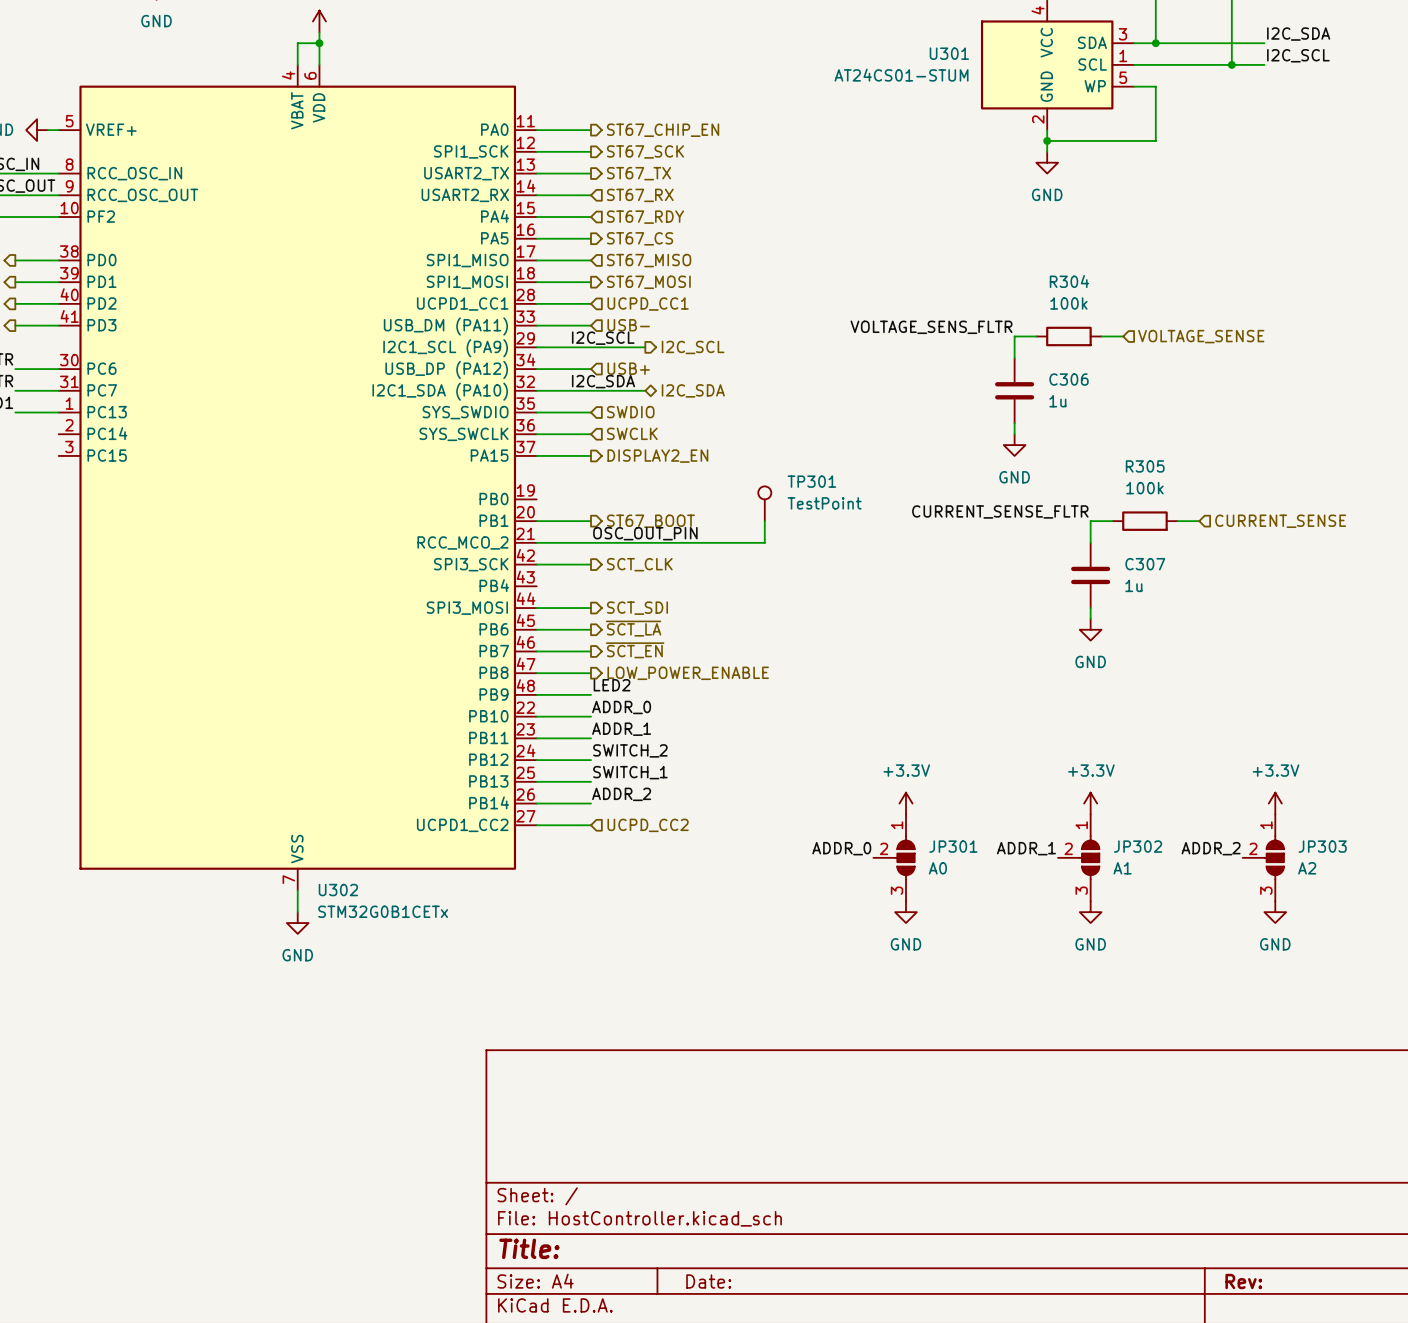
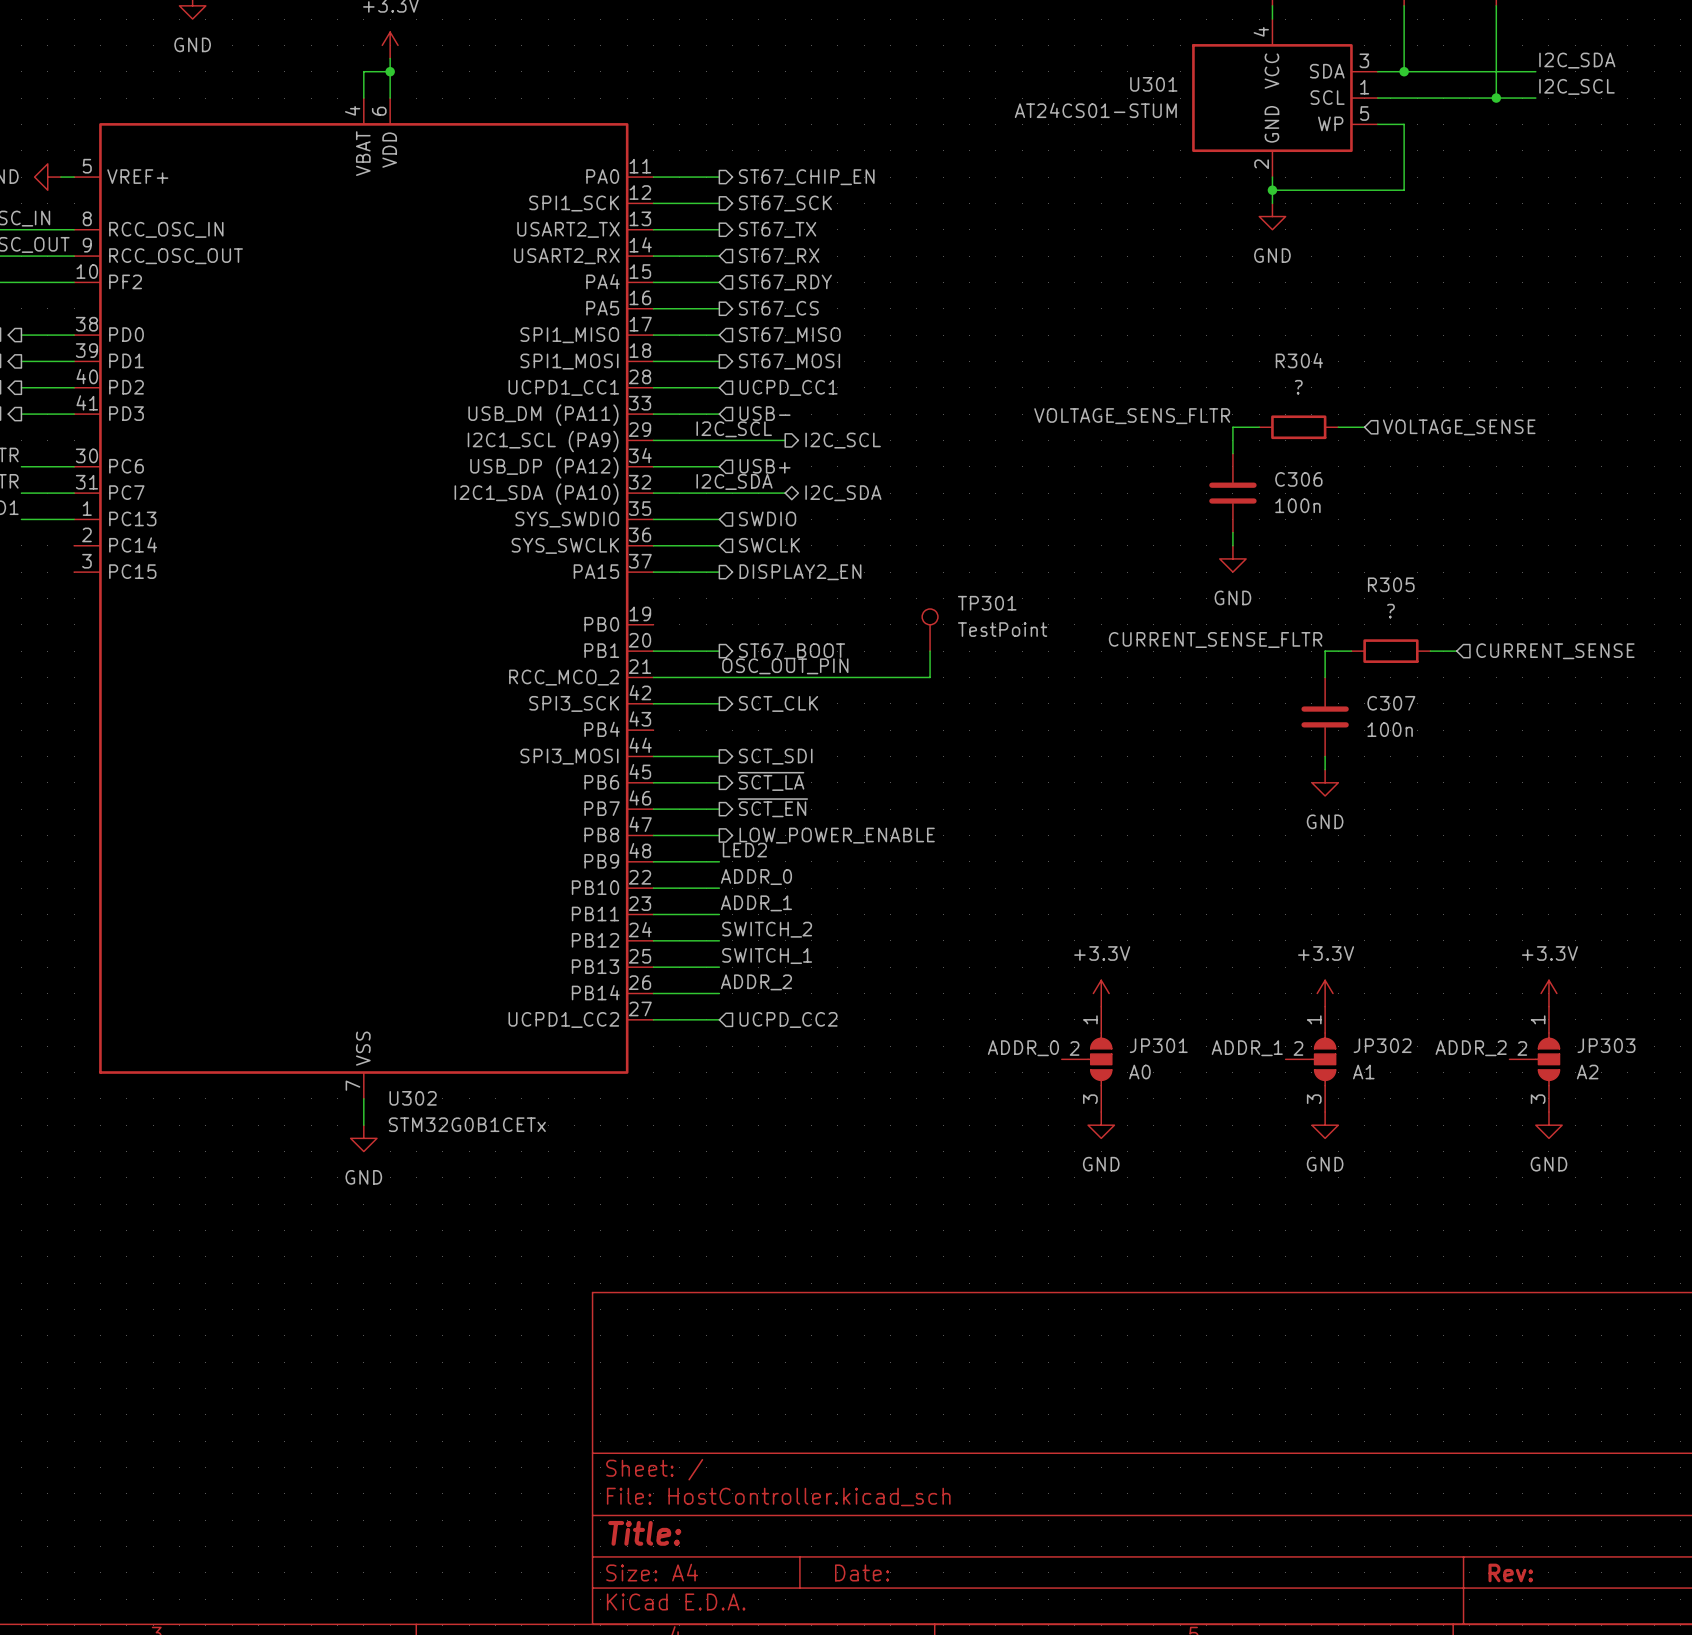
R304 value: 100k (1068, 303) -> ? (1298, 387)
C306 value: 1u (1057, 401) -> 100n (1297, 505)
R305 value: 100k (1144, 488) -> ? (1390, 611)
C307 value: 1u (1133, 585) -> 100n (1390, 729)

